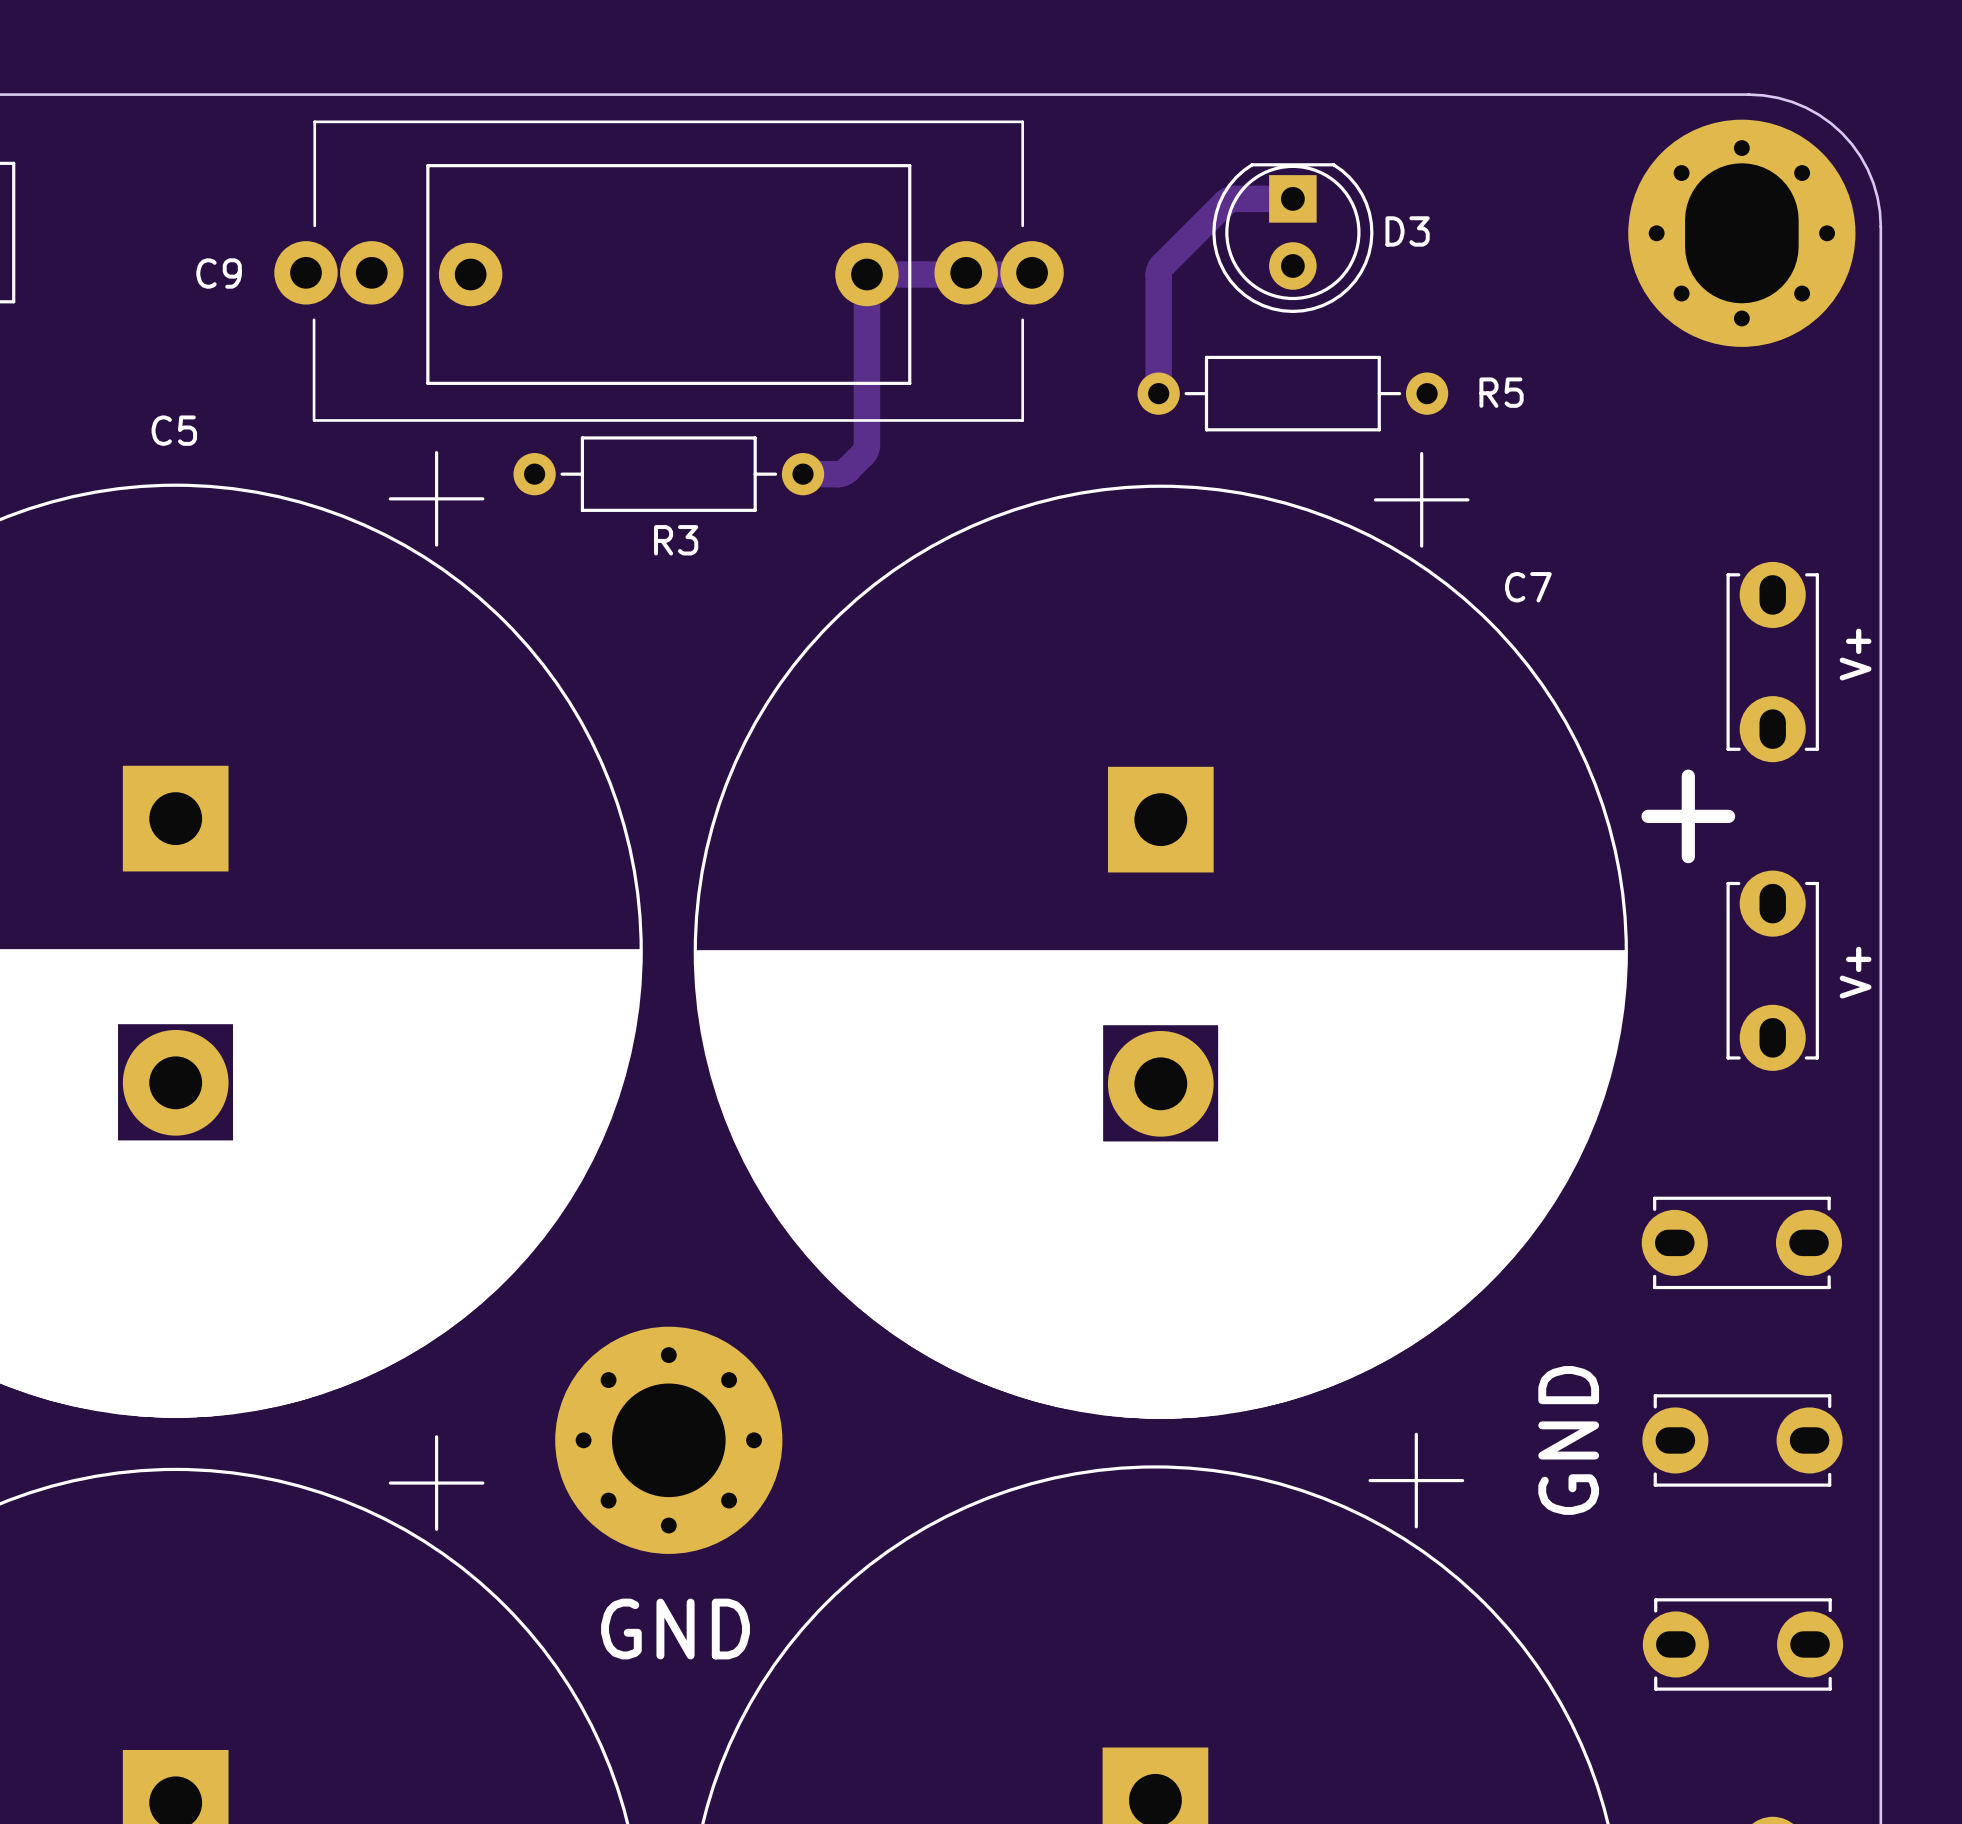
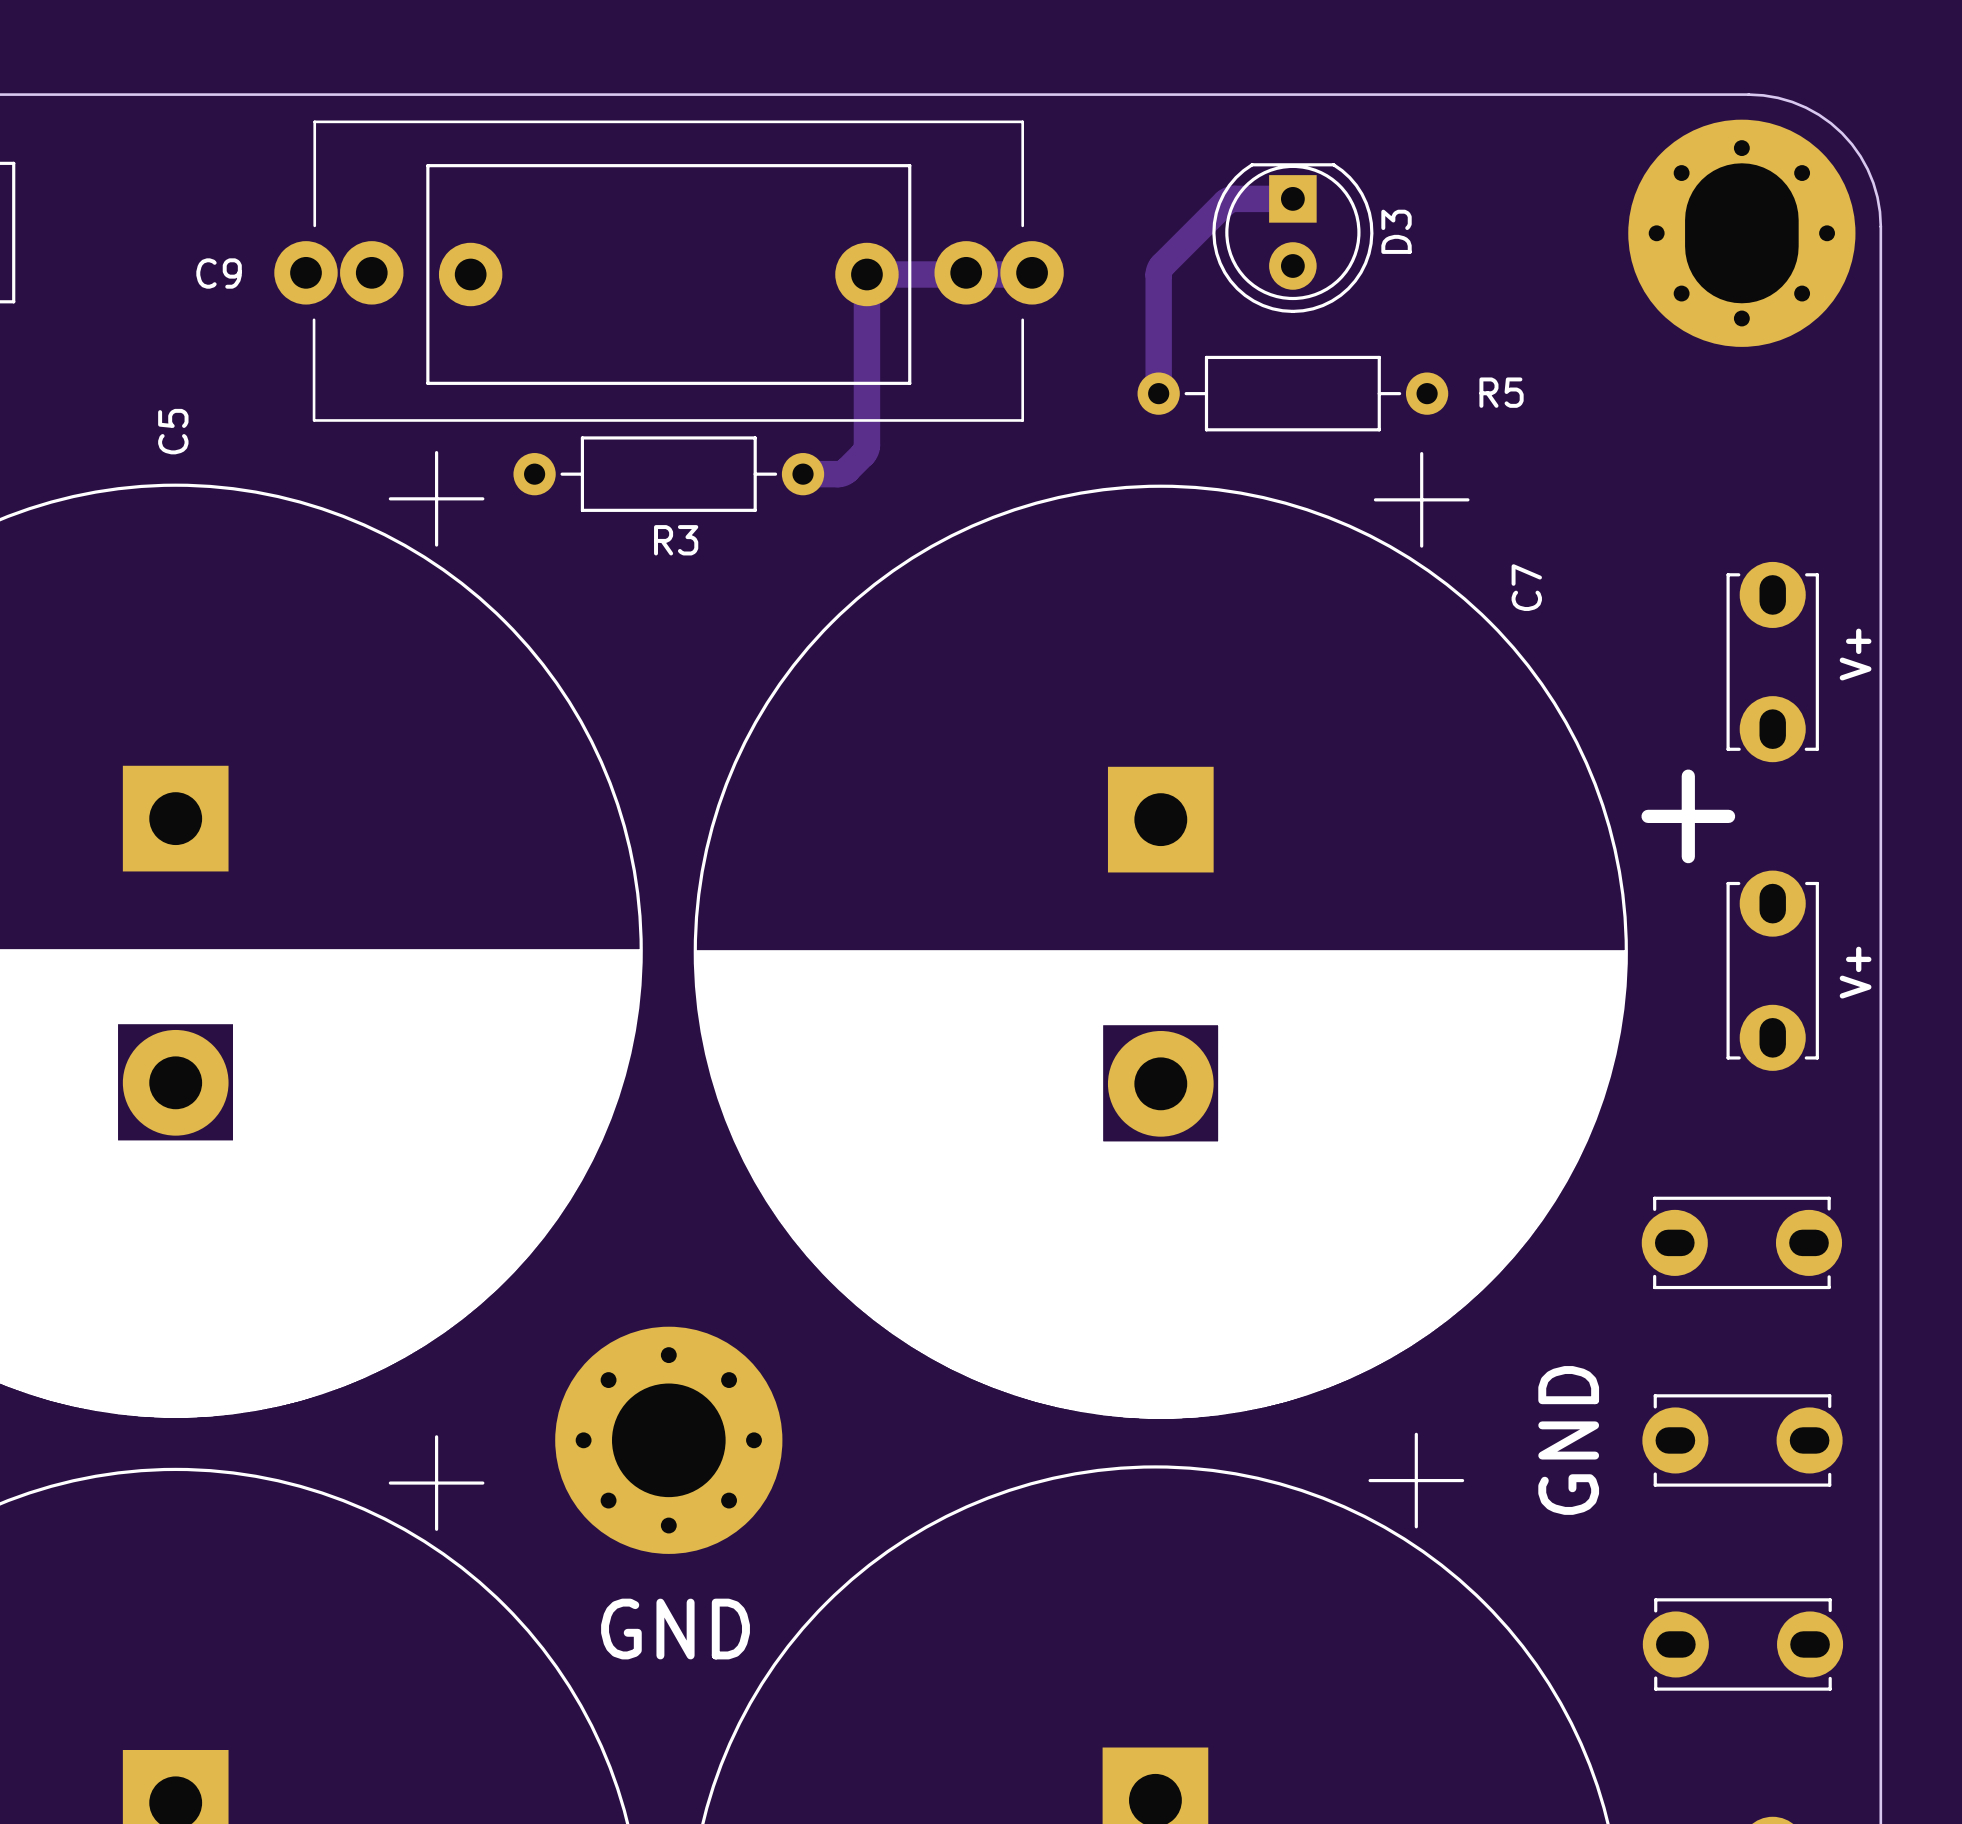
D3 name rotation: 0° (1407, 231) -> 90° counterclockwise (1396, 231)
C5 name rotation: 0° (174, 430) -> 90° counterclockwise (173, 431)
C7 name rotation: 0° (1528, 587) -> 90° counterclockwise (1526, 587)

